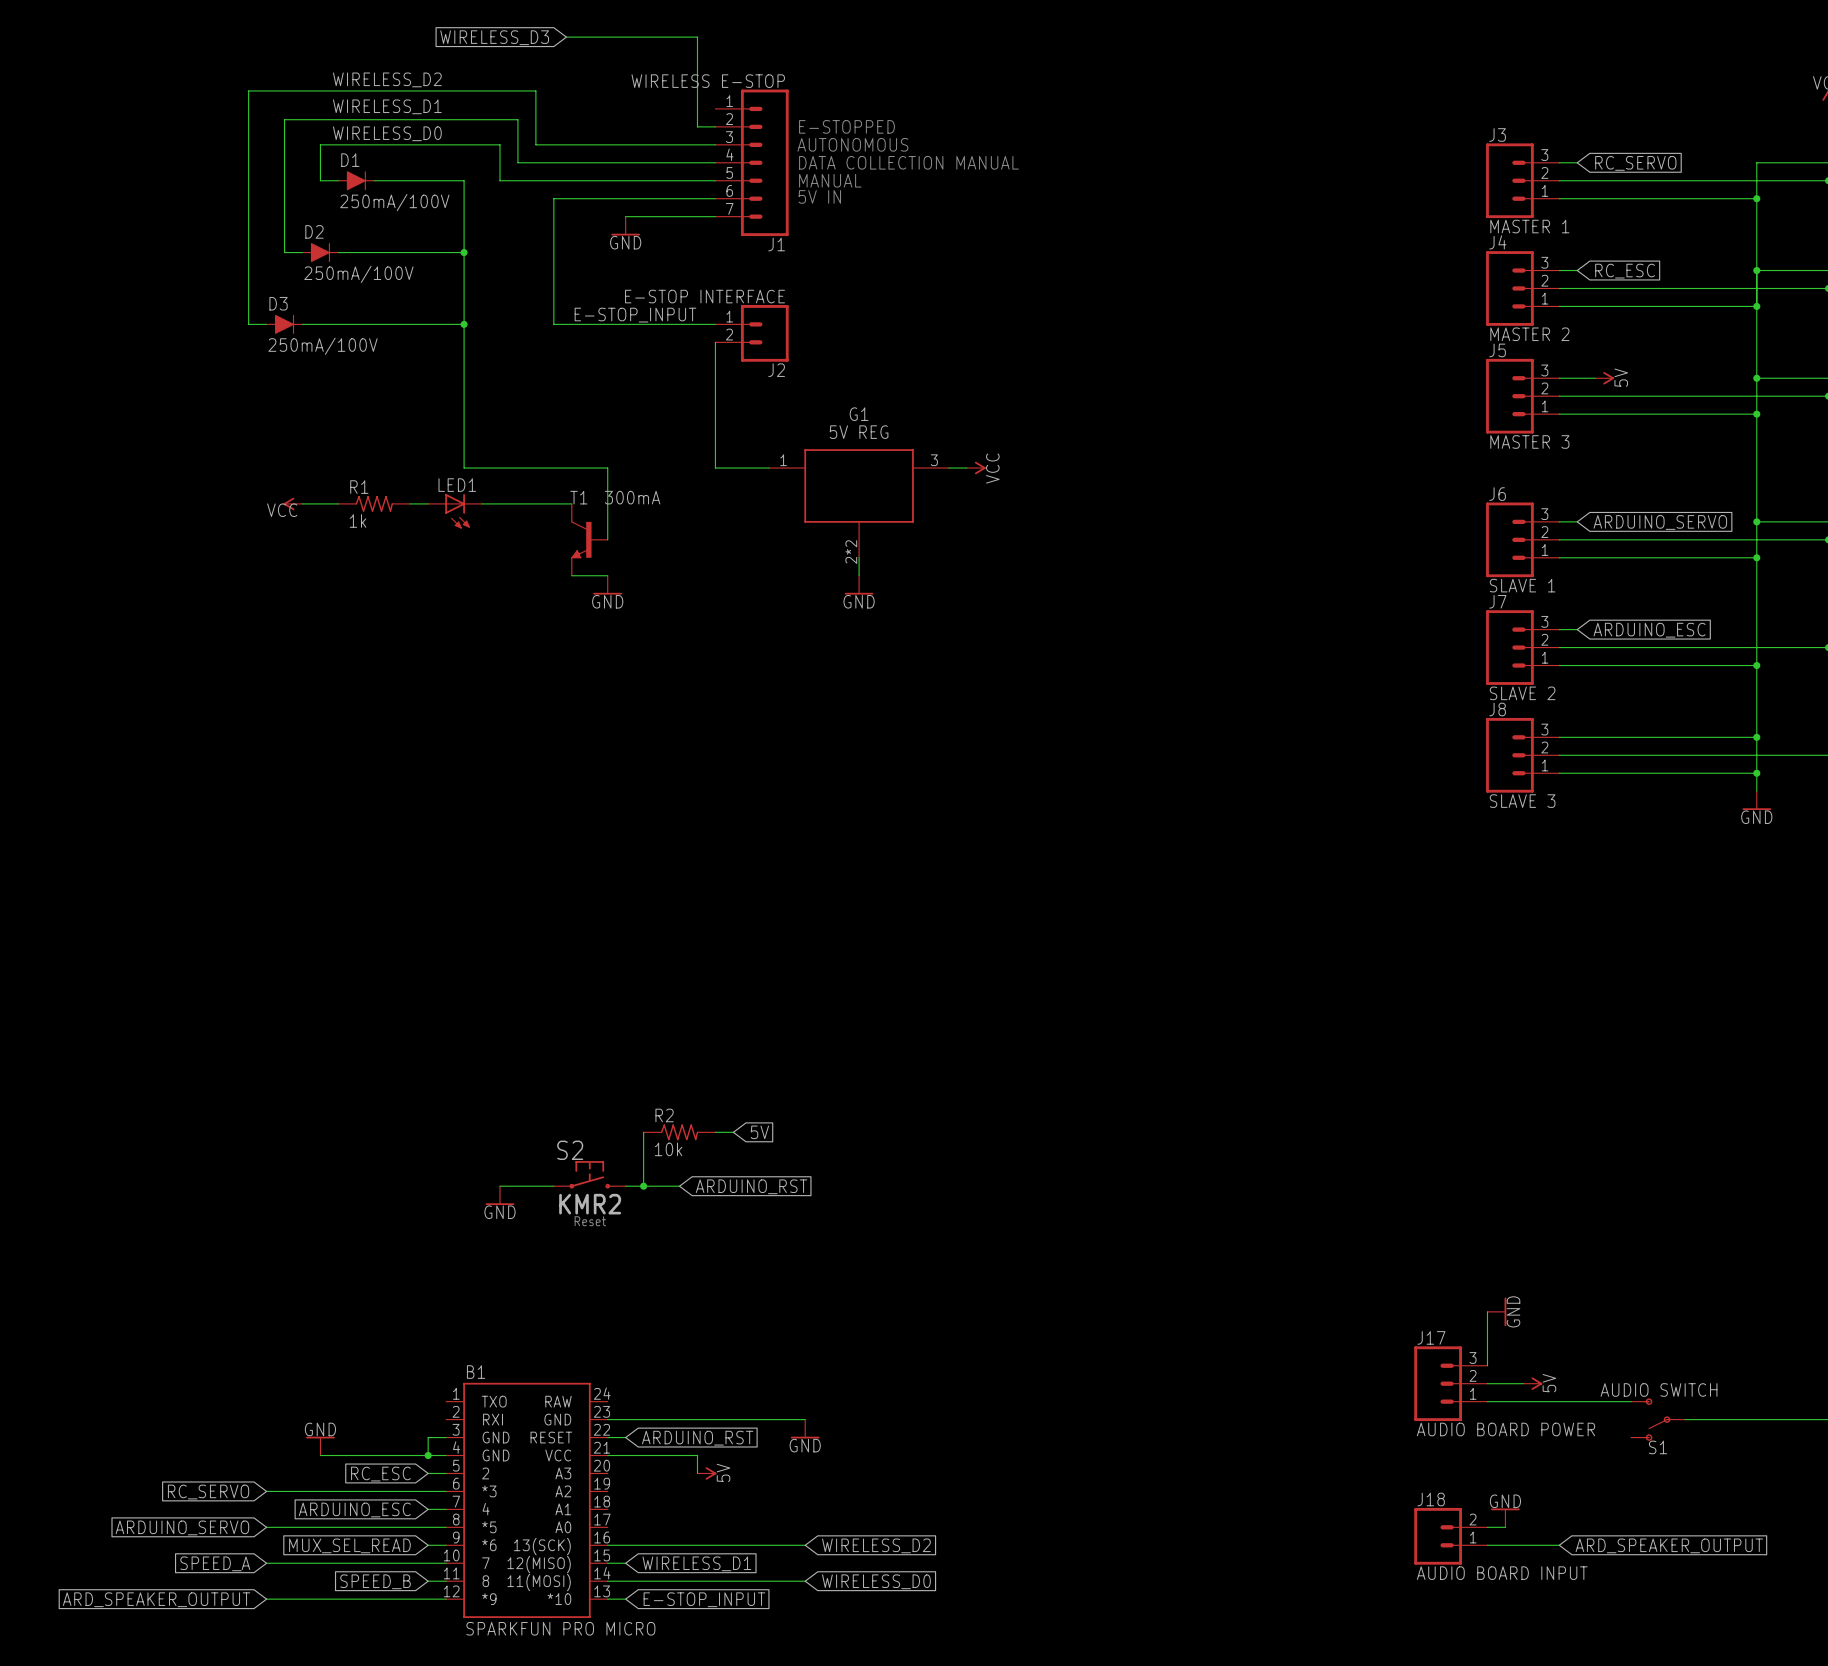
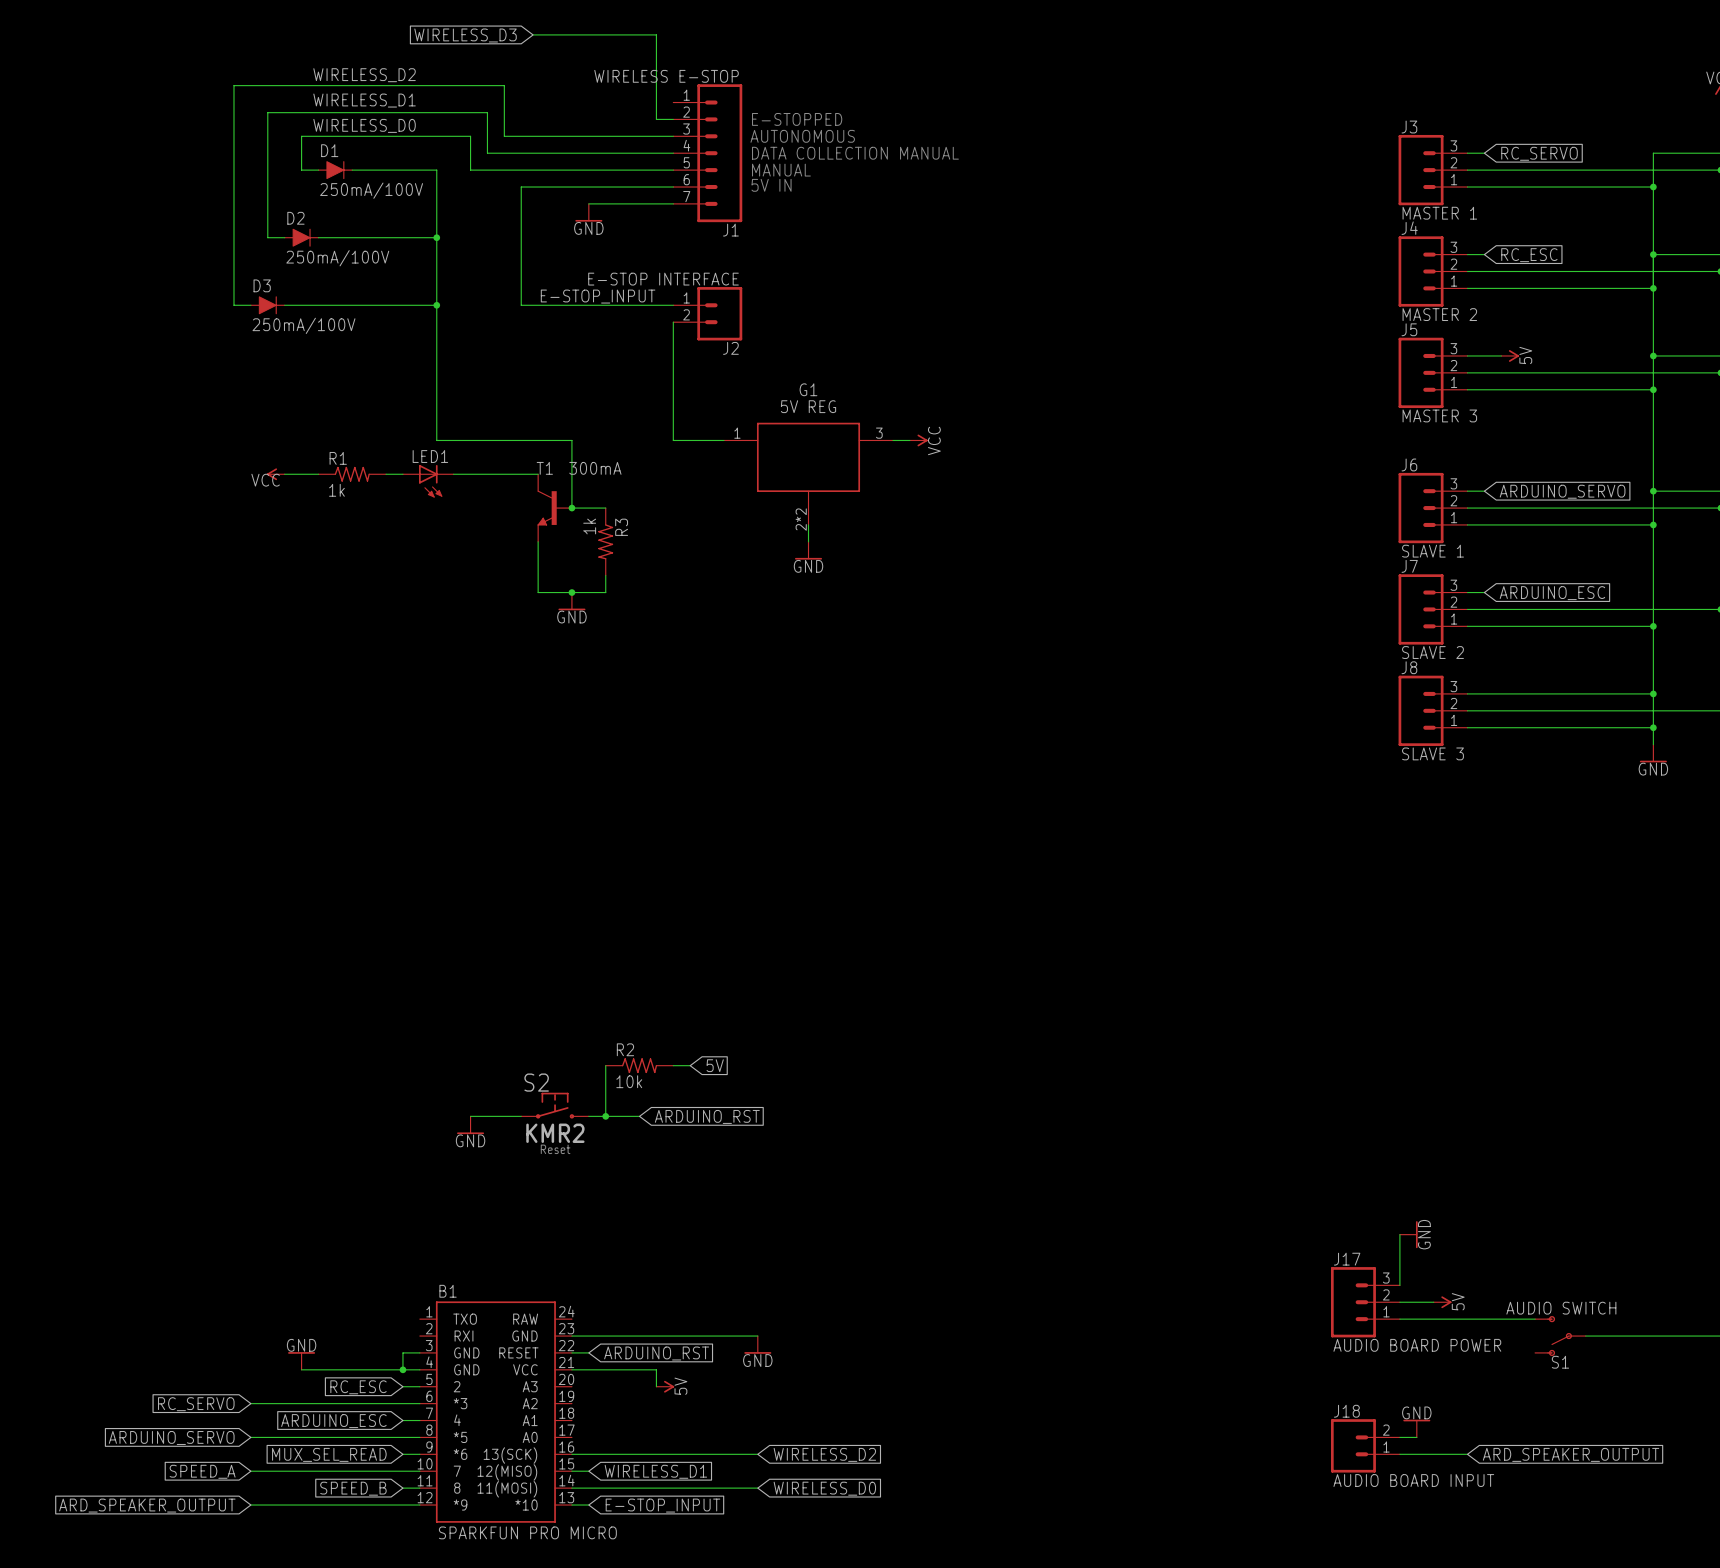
wire: none -> (571, 508) (605, 508)
junction: none -> (571, 508)
wire: (571, 575) (607, 575) -> (538, 541) (538, 592) (605, 592) (605, 575)
R3: none -> 1k (605, 541)
power symbol position: GND (607, 585) -> GND (571, 601)
junction: none -> (571, 592)

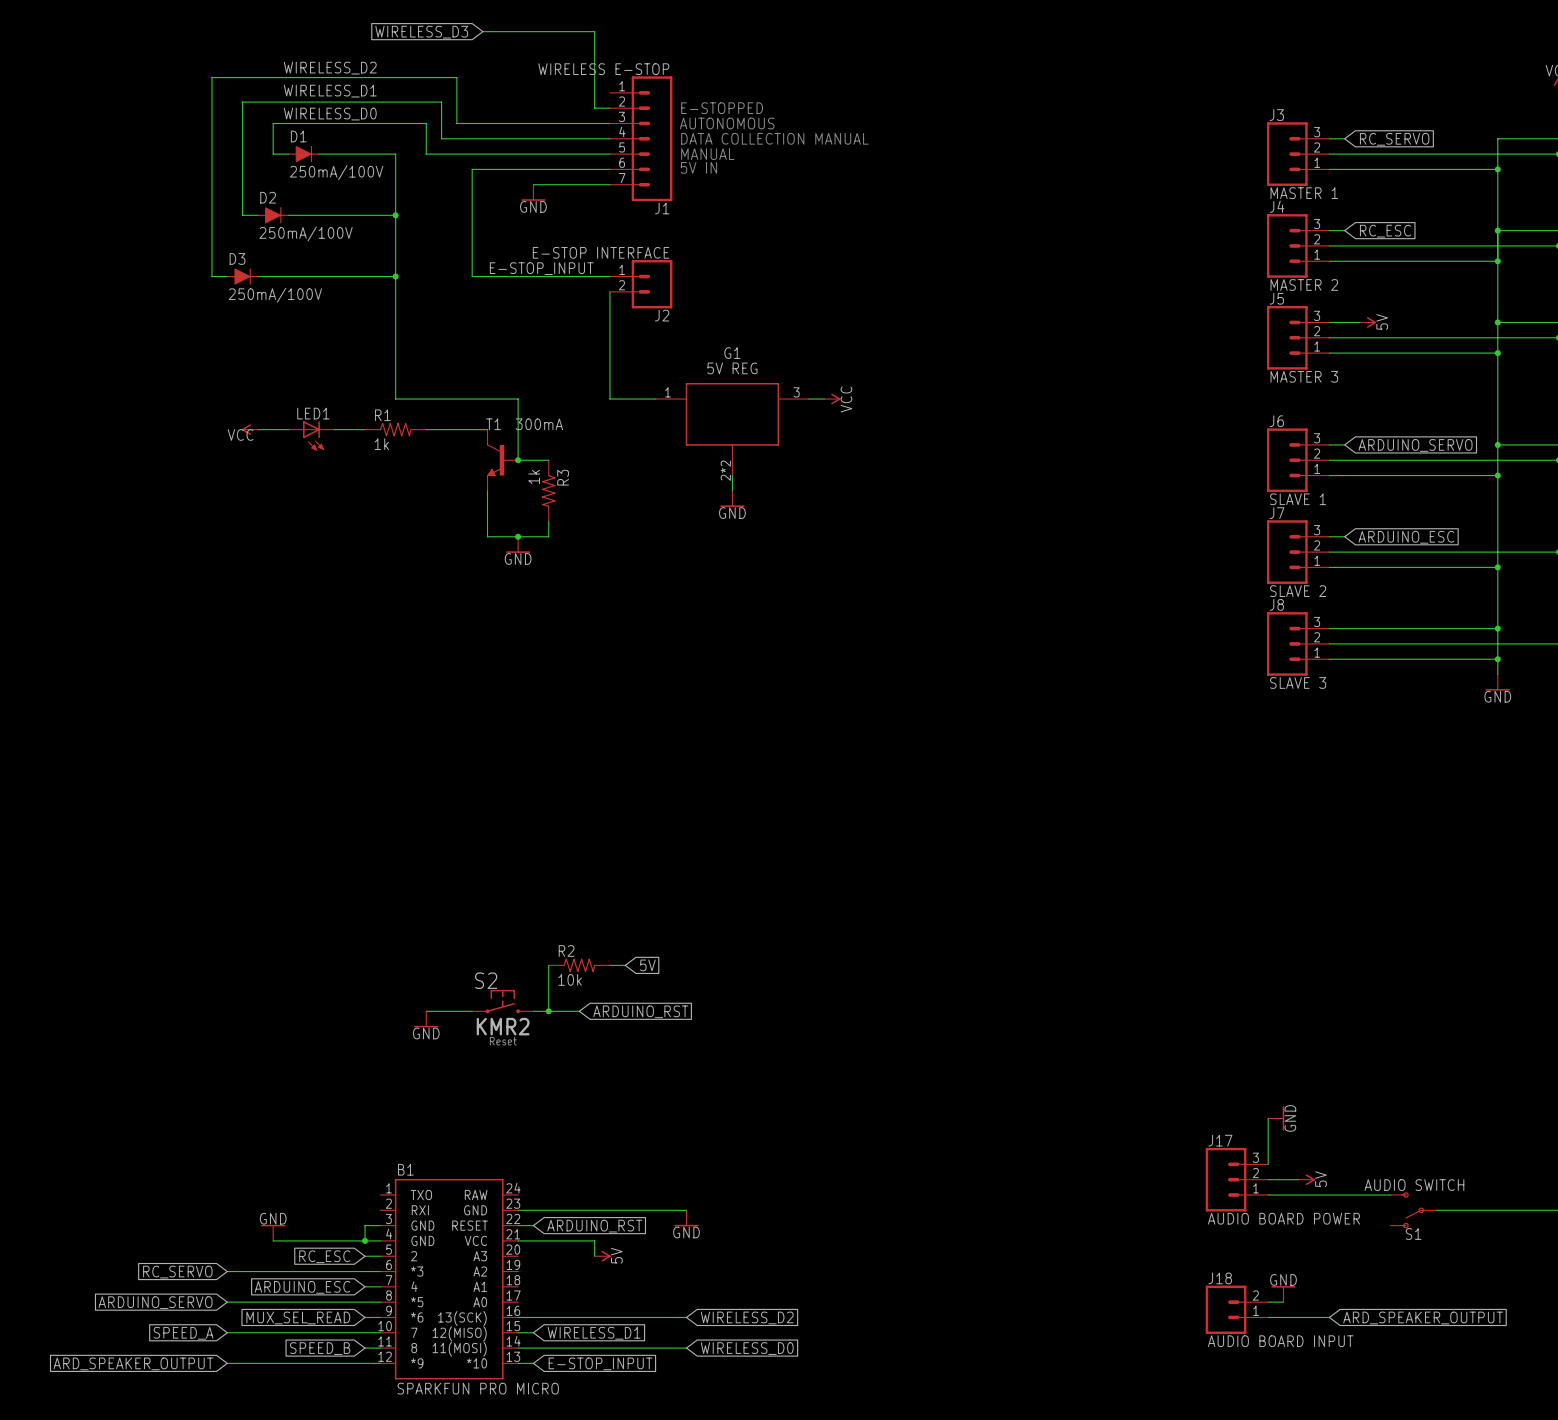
R1 position: (352, 474) -> (395, 429)
LED1 position: (428, 481) -> (311, 435)

